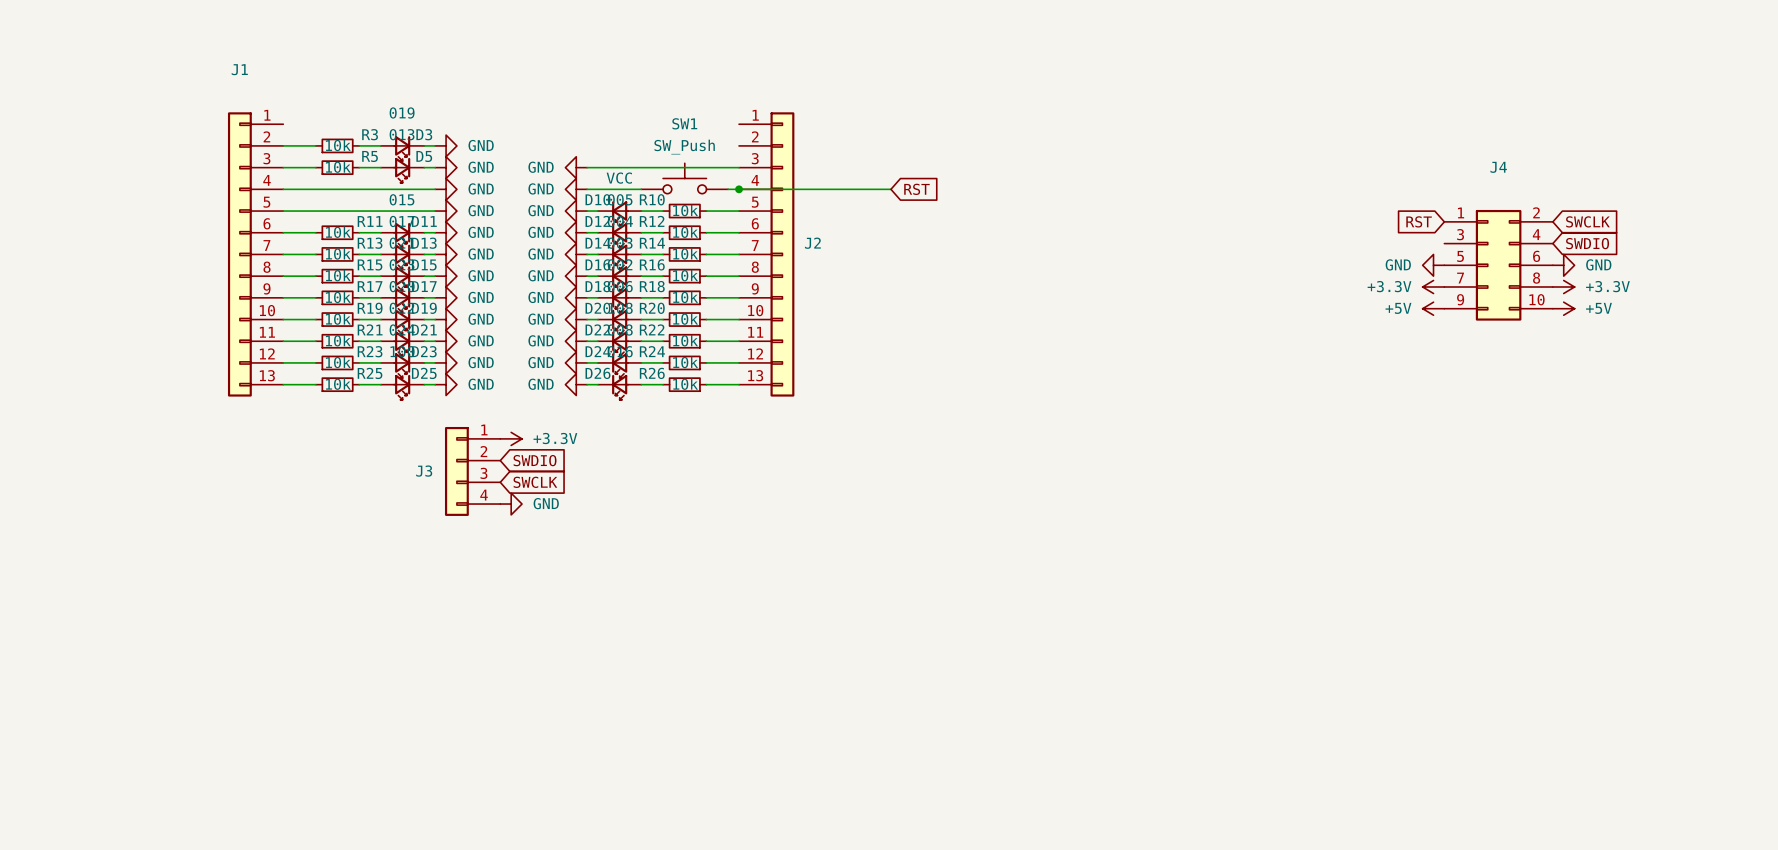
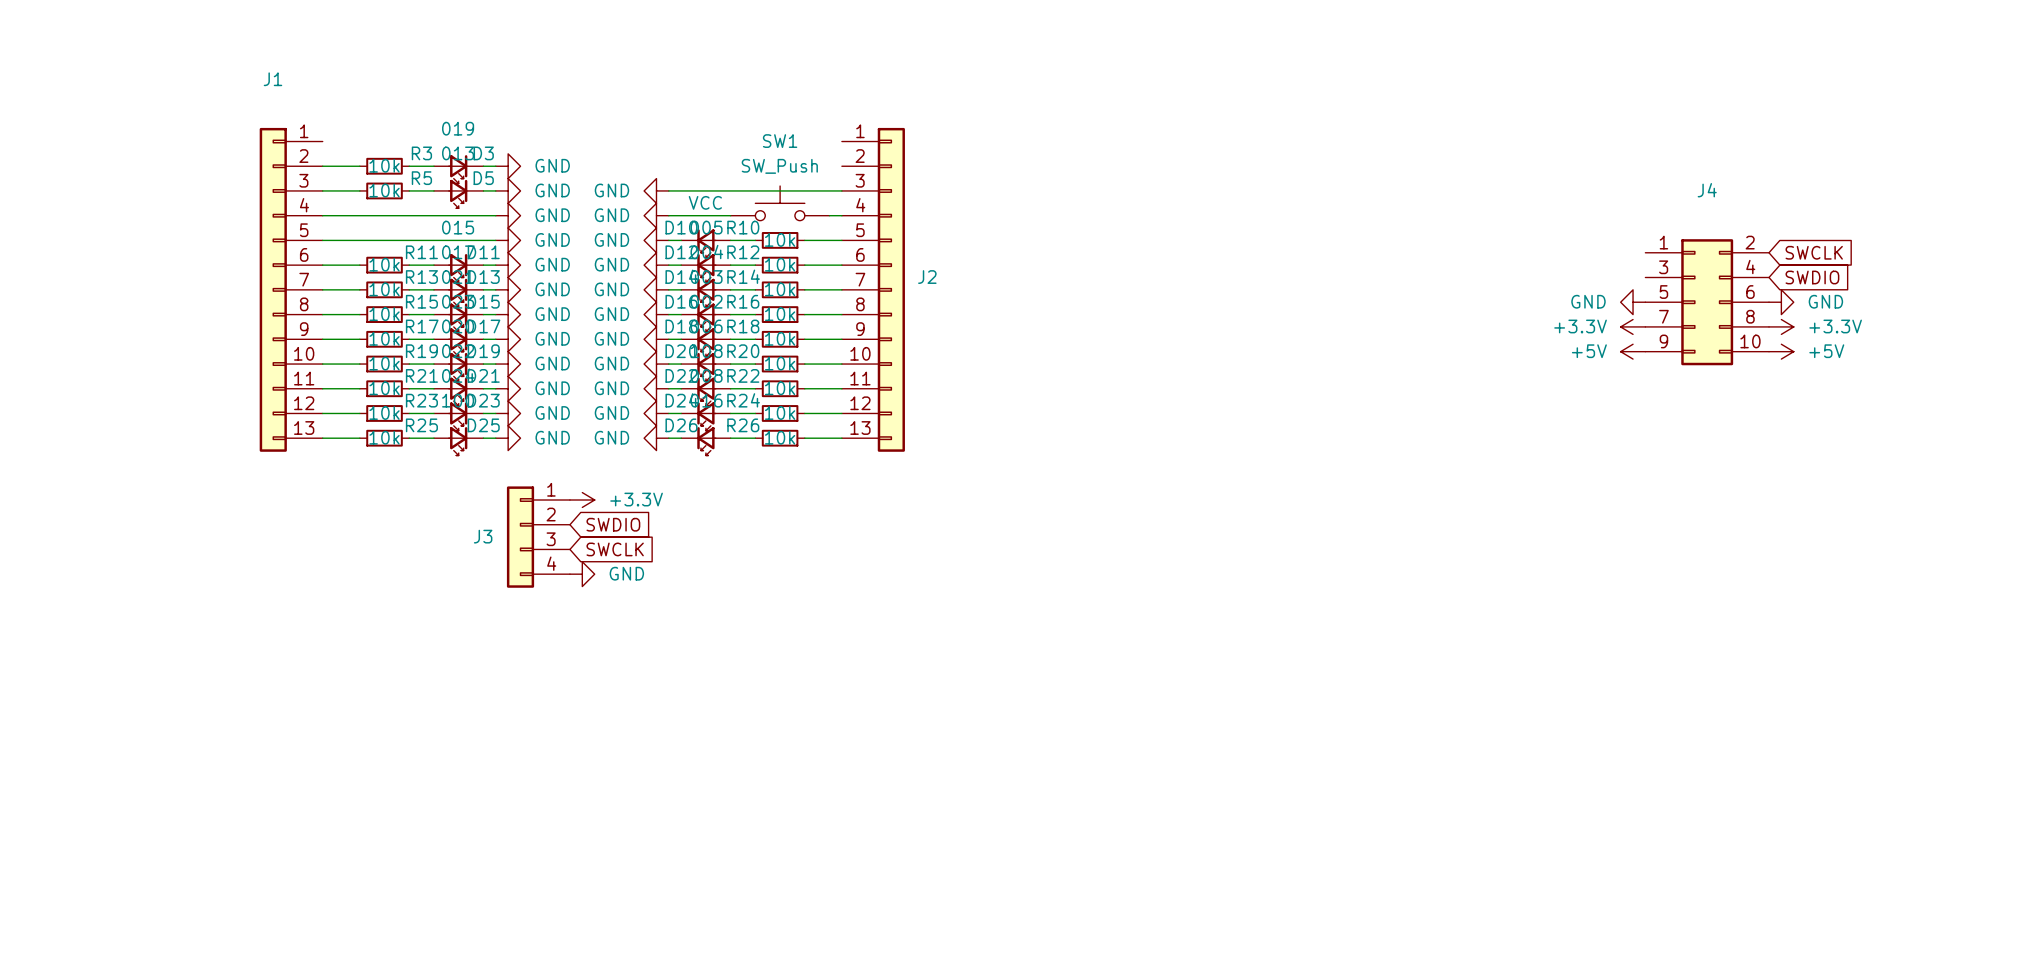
wire: (739, 189) (890, 189) -> none
junction: (739, 189) -> none
global label: RST (916, 189) -> none
global label: RST (1419, 221) -> none

